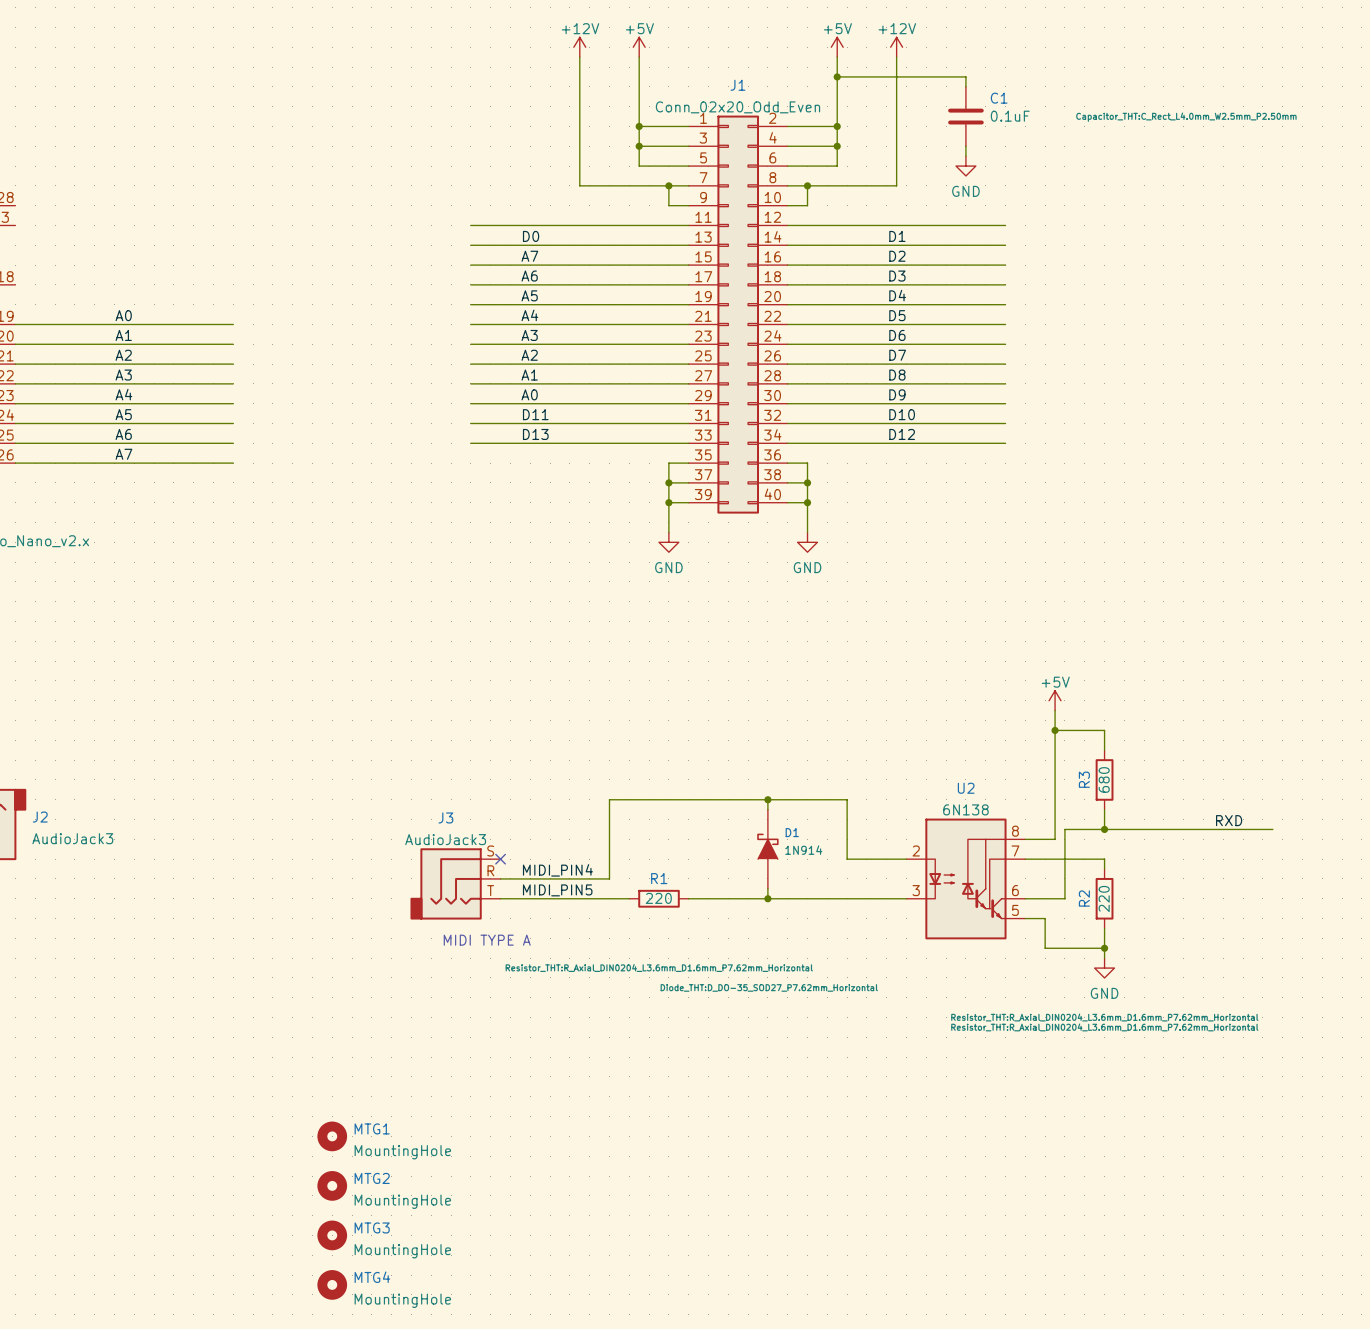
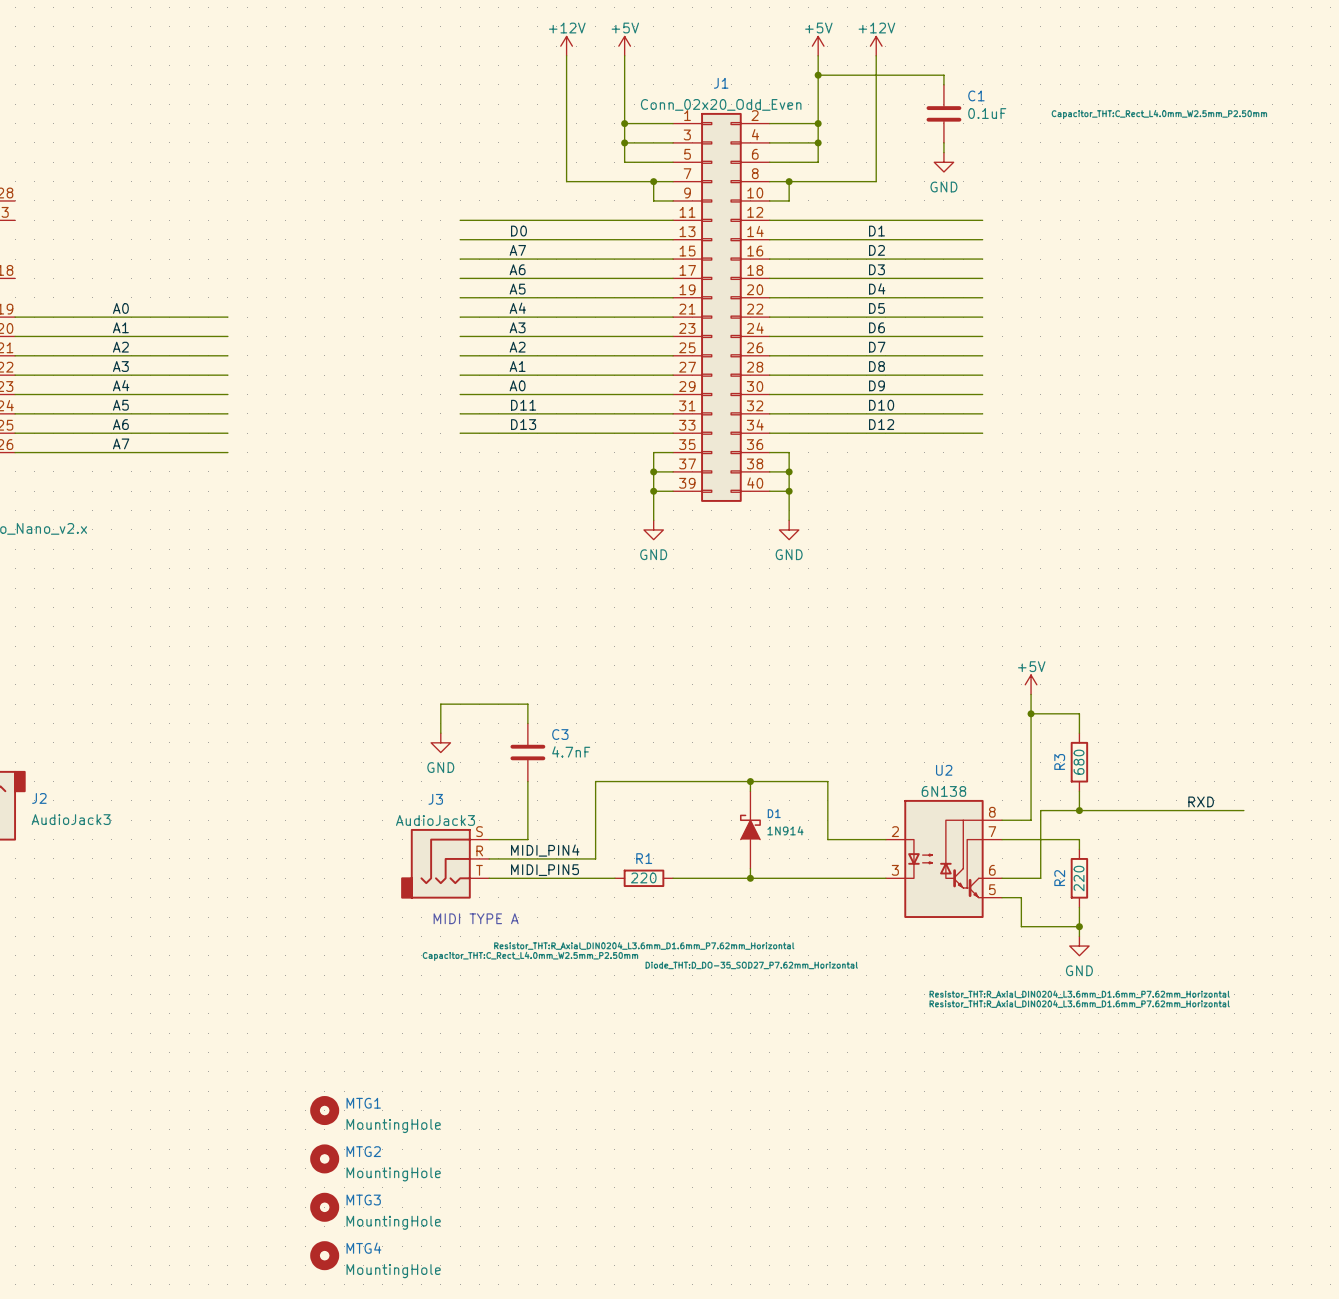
wire: none -> (527, 723) (527, 704) (440, 704) (440, 733)
power symbol: none -> GND (440, 742)
C3: none -> 4.7nF (527, 752)
wire: none -> (527, 781) (527, 839) (489, 839)
no-connect mark: (500, 859) -> none

